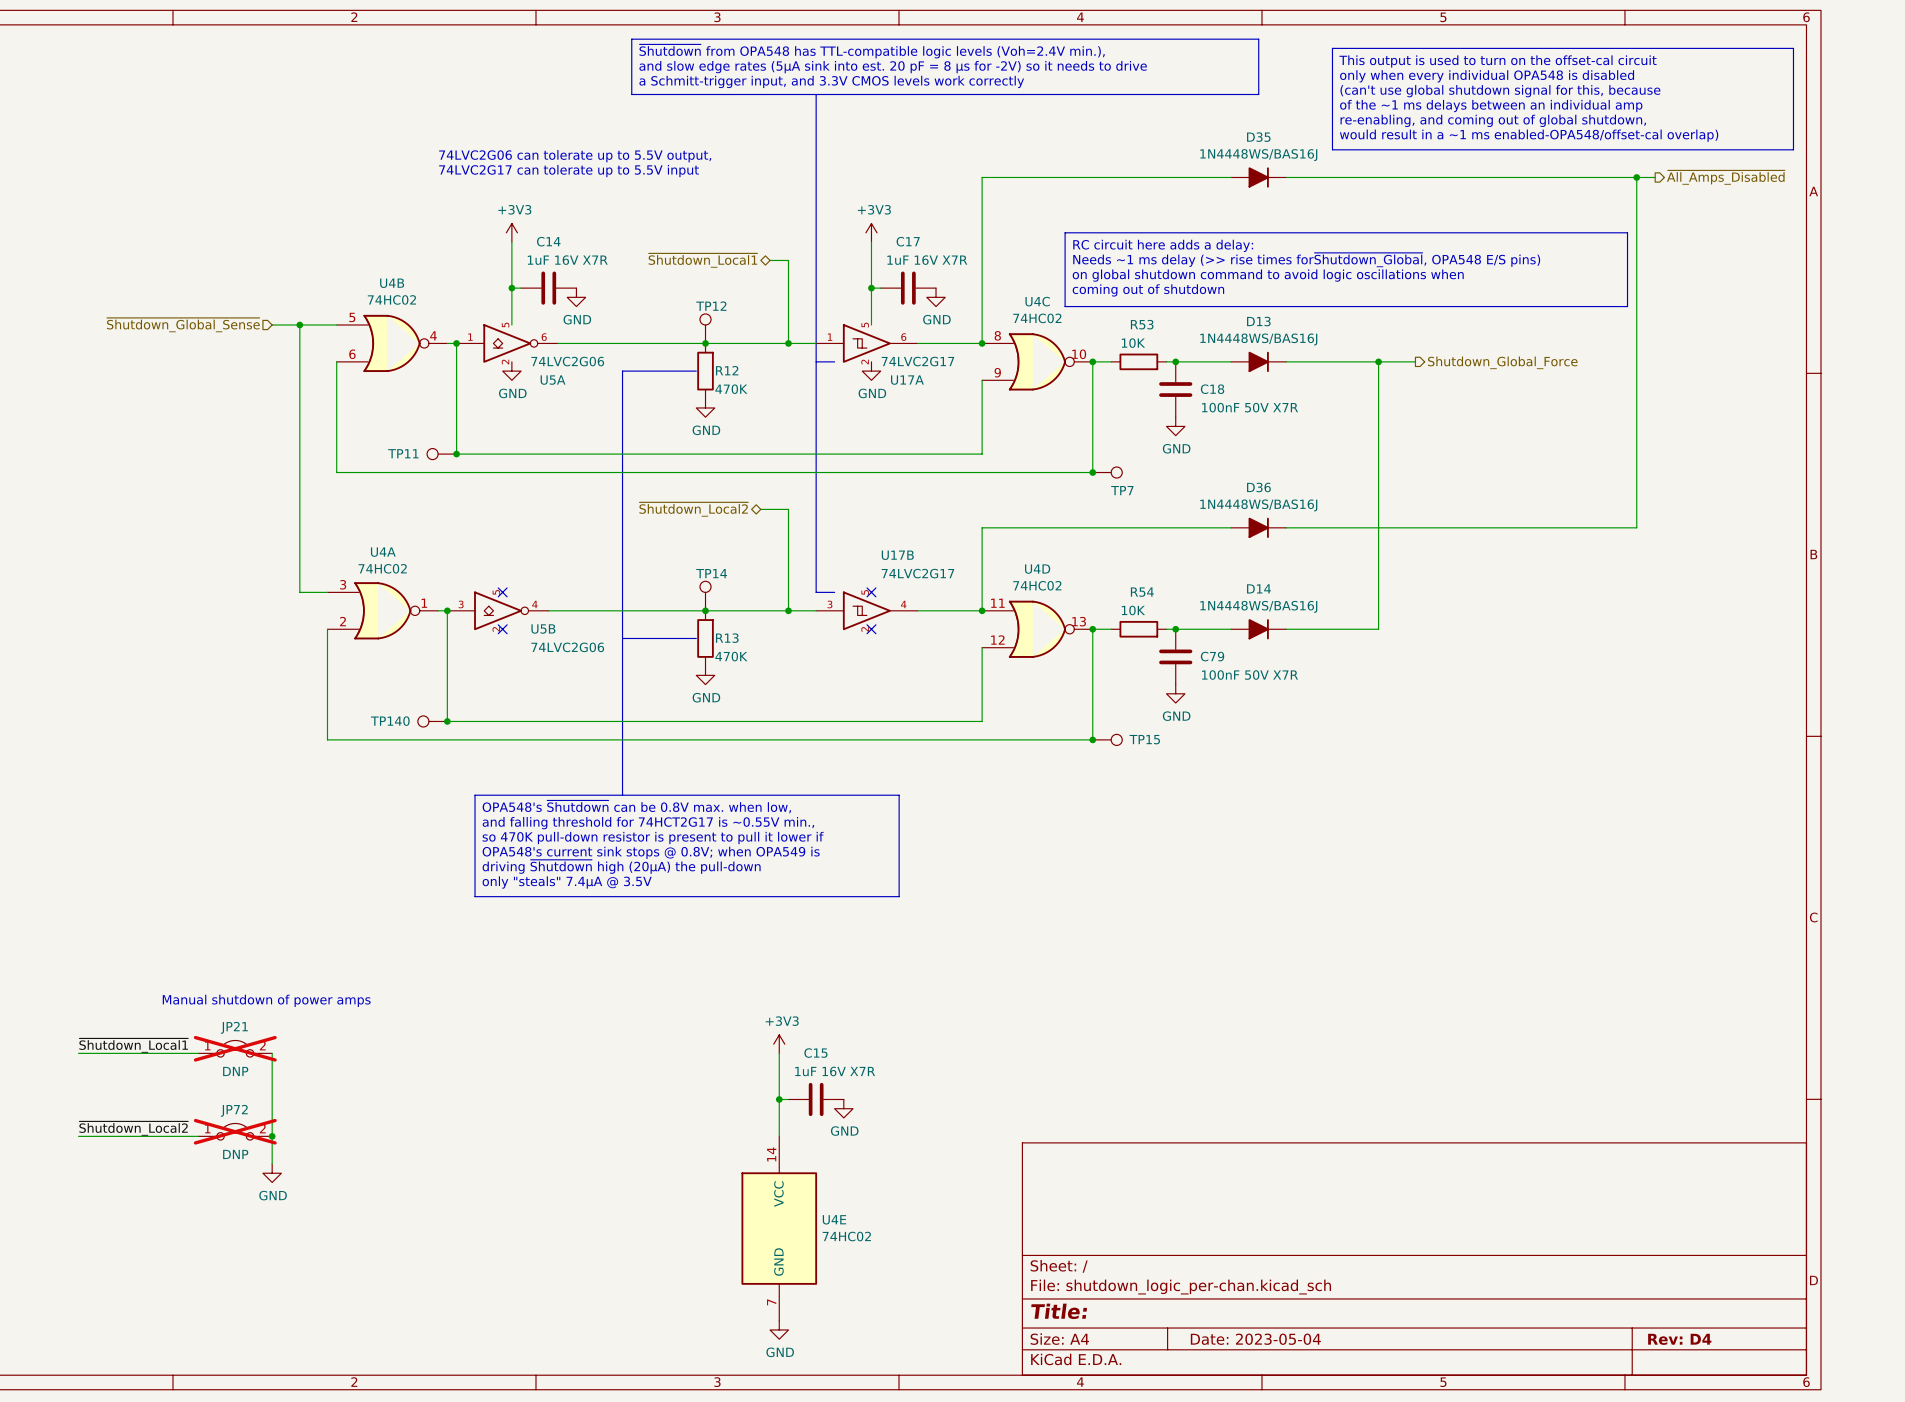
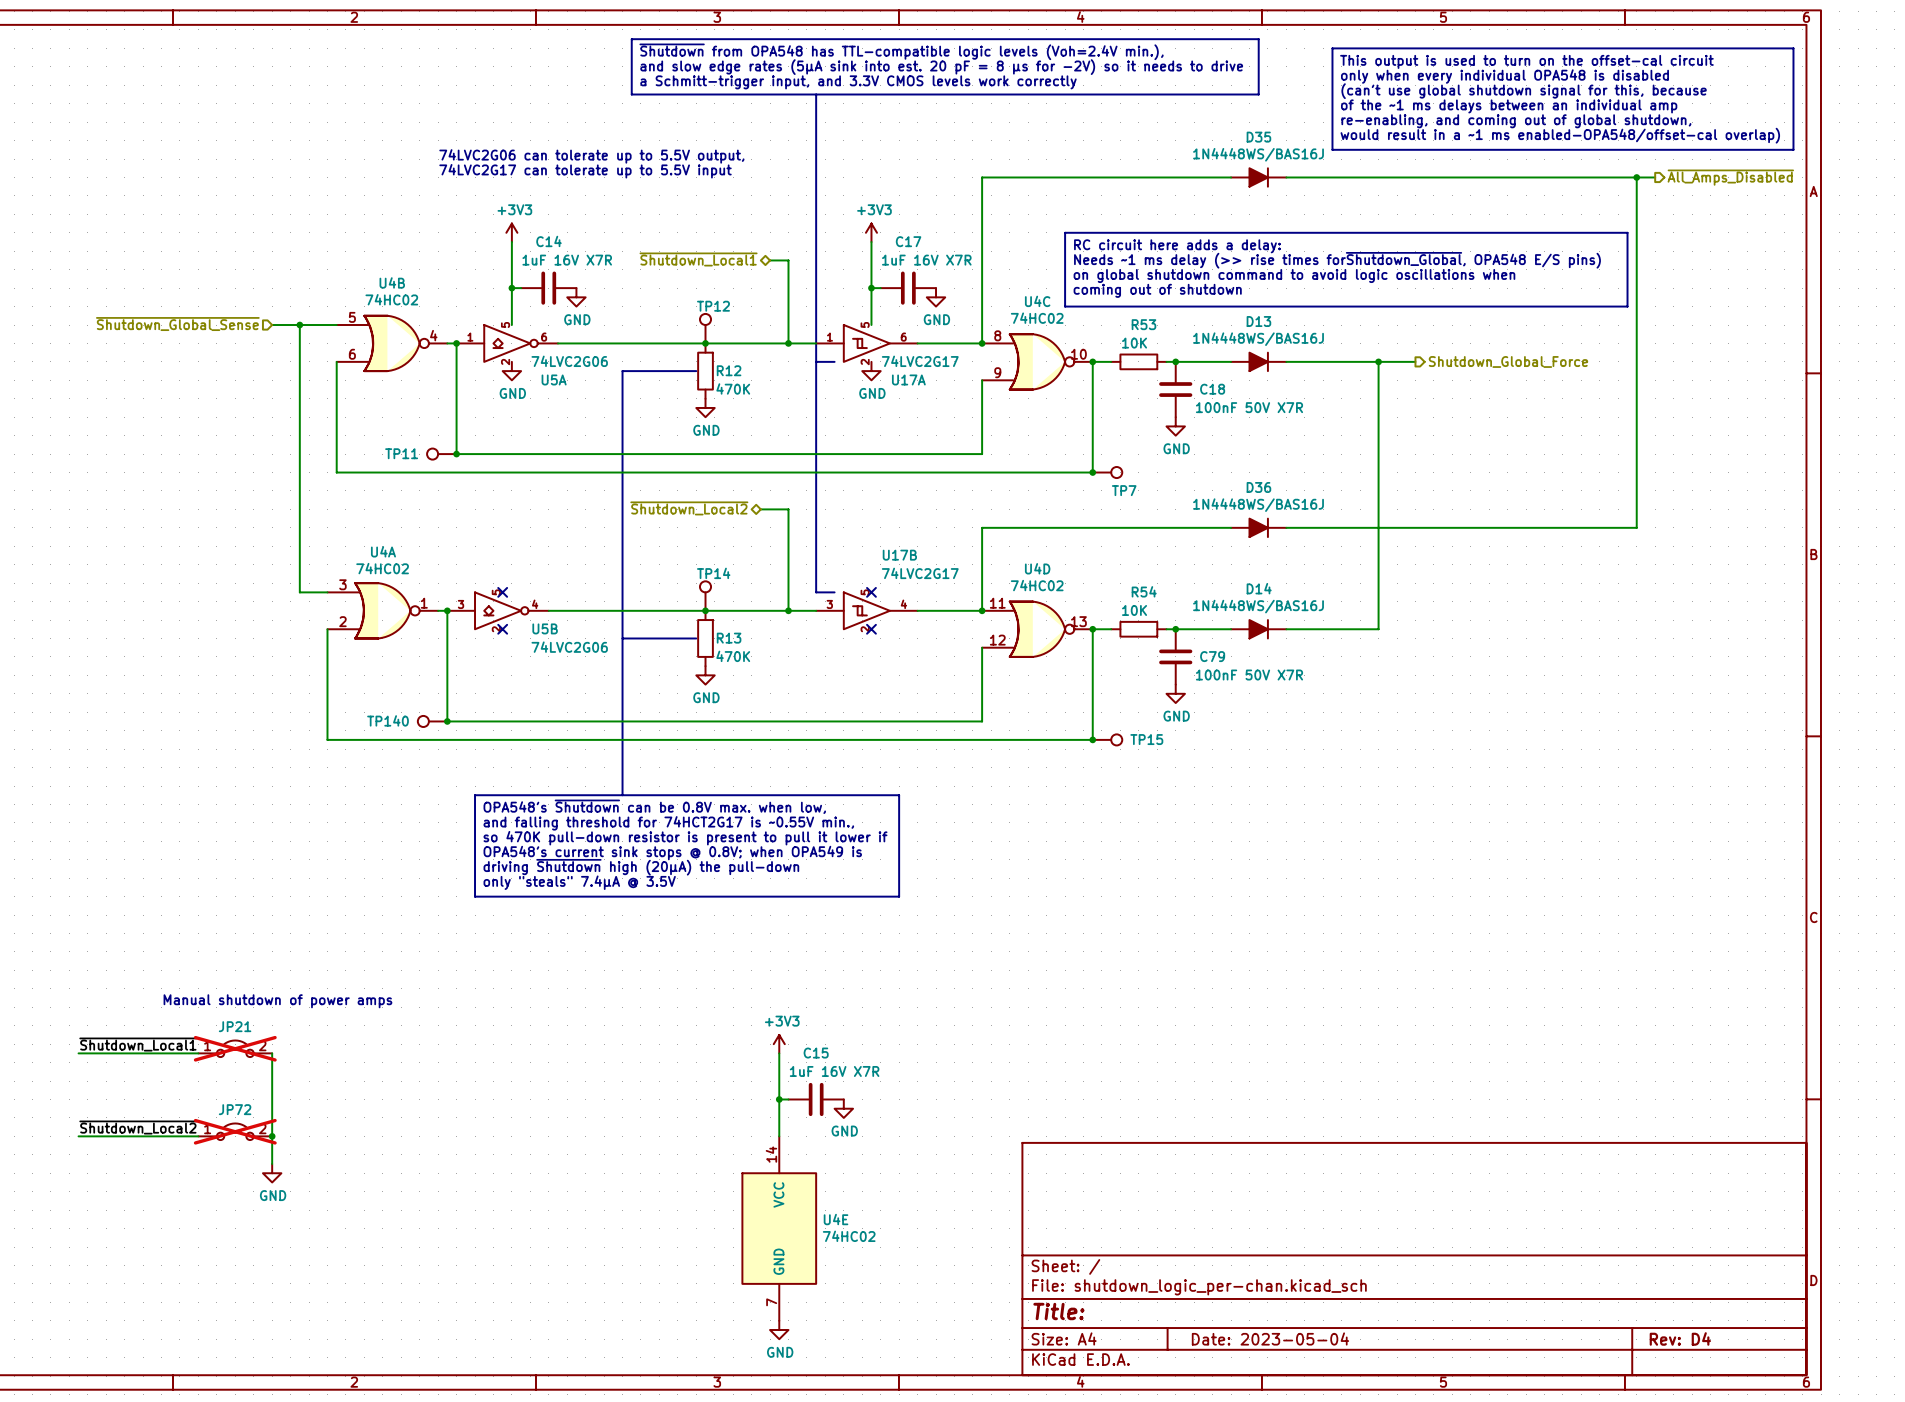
JP21 text: DNP (235, 1071) -> none
JP72 text: DNP (235, 1154) -> none

